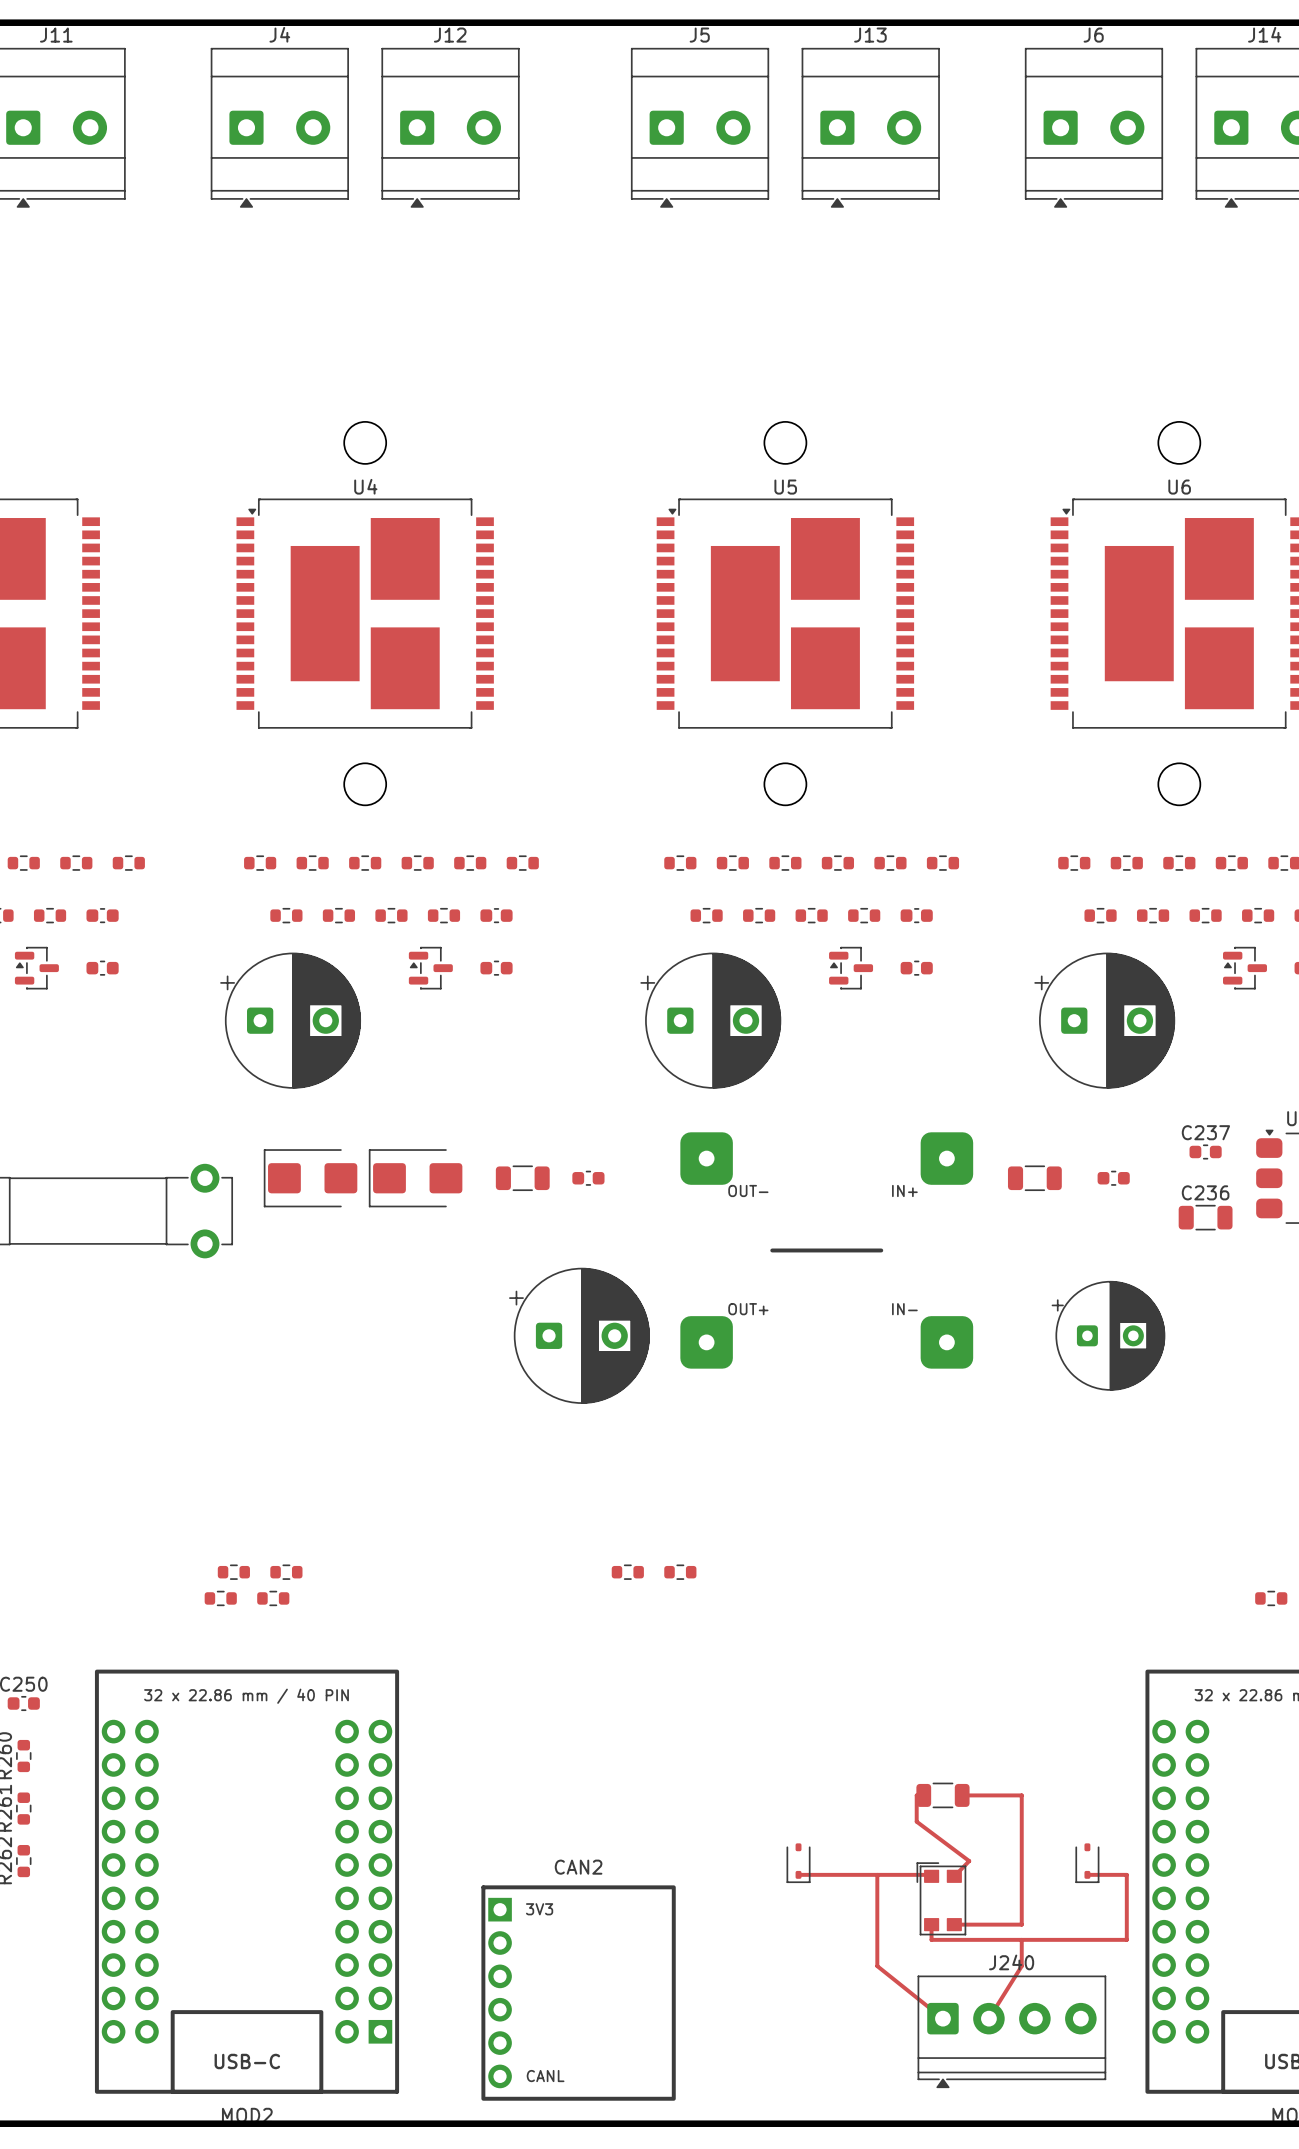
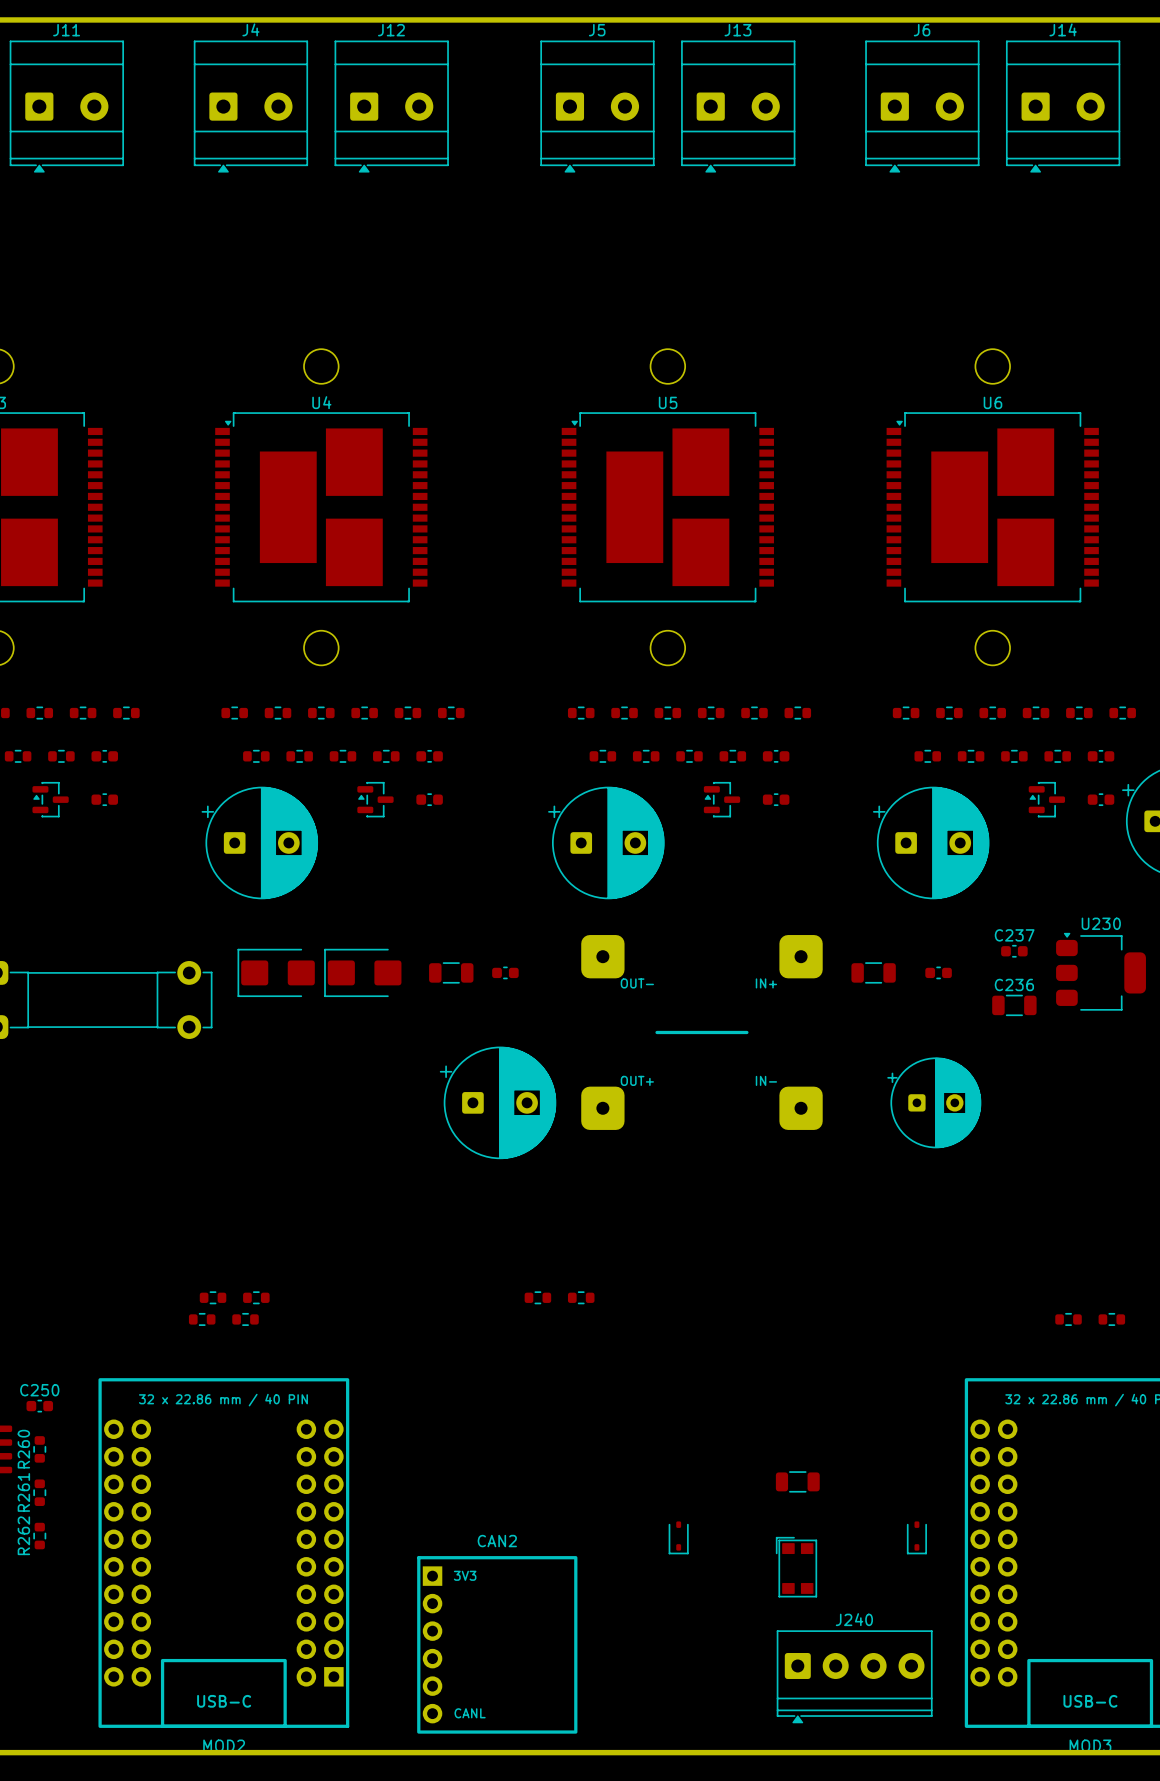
top track: (923, 1795) (916, 1795) (916, 1821) (969, 1861) (954, 1876) -> none
top track: (962, 1795) (1021, 1795) (1021, 1924) (954, 1924) -> none
top track: (798, 1874) (931, 1876) -> none
top track: (877, 1874) (877, 1966) (942, 2018) -> none
top track: (1087, 1874) (1126, 1874) (1126, 1939) (931, 1939) (931, 1924) -> none
top track: (1021, 1939) (1021, 1966) (988, 2018) -> none

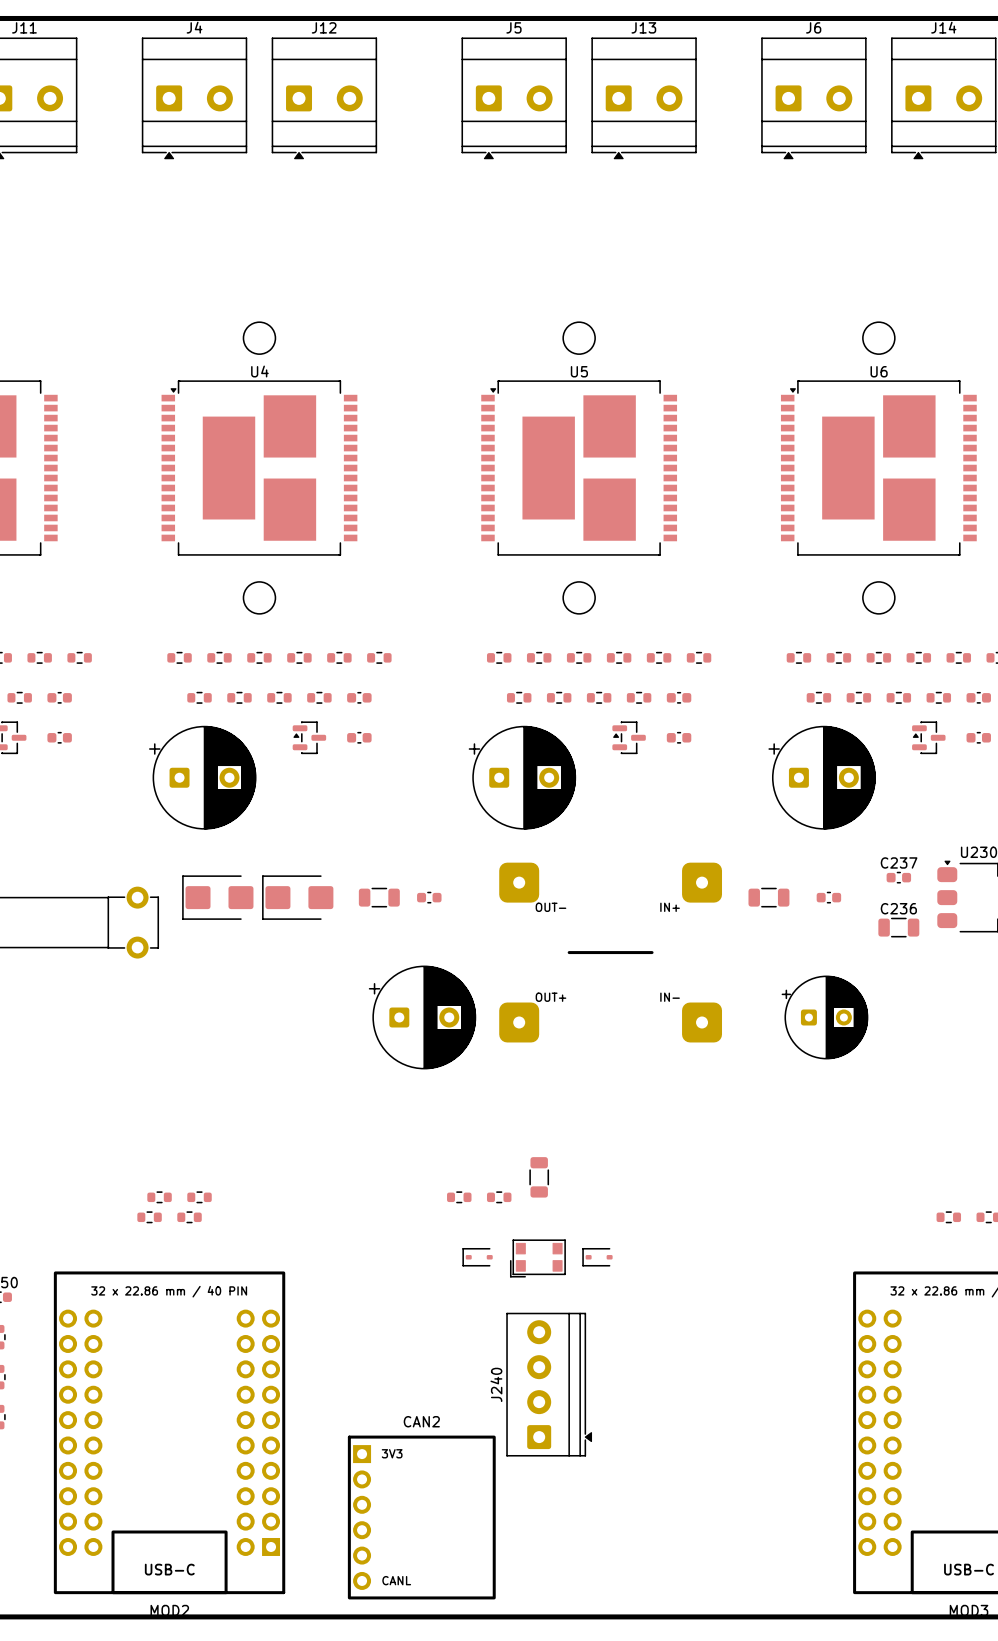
part: none -> (477, 1257)
part: none -> (597, 1257)
part rotation: 0° (797, 1481) -> 90° clockwise (539, 1177)
part position: (797, 1481) -> (539, 1177)
part: (678, 1537) -> none
part: (916, 1537) -> none
part rotation: 0° (796, 1567) -> 90° counterclockwise (537, 1258)
part position: (796, 1567) -> (537, 1258)
J240 rotation: 0° (854, 1676) -> 90° counterclockwise (549, 1384)
J240 position: (854, 1676) -> (549, 1384)

